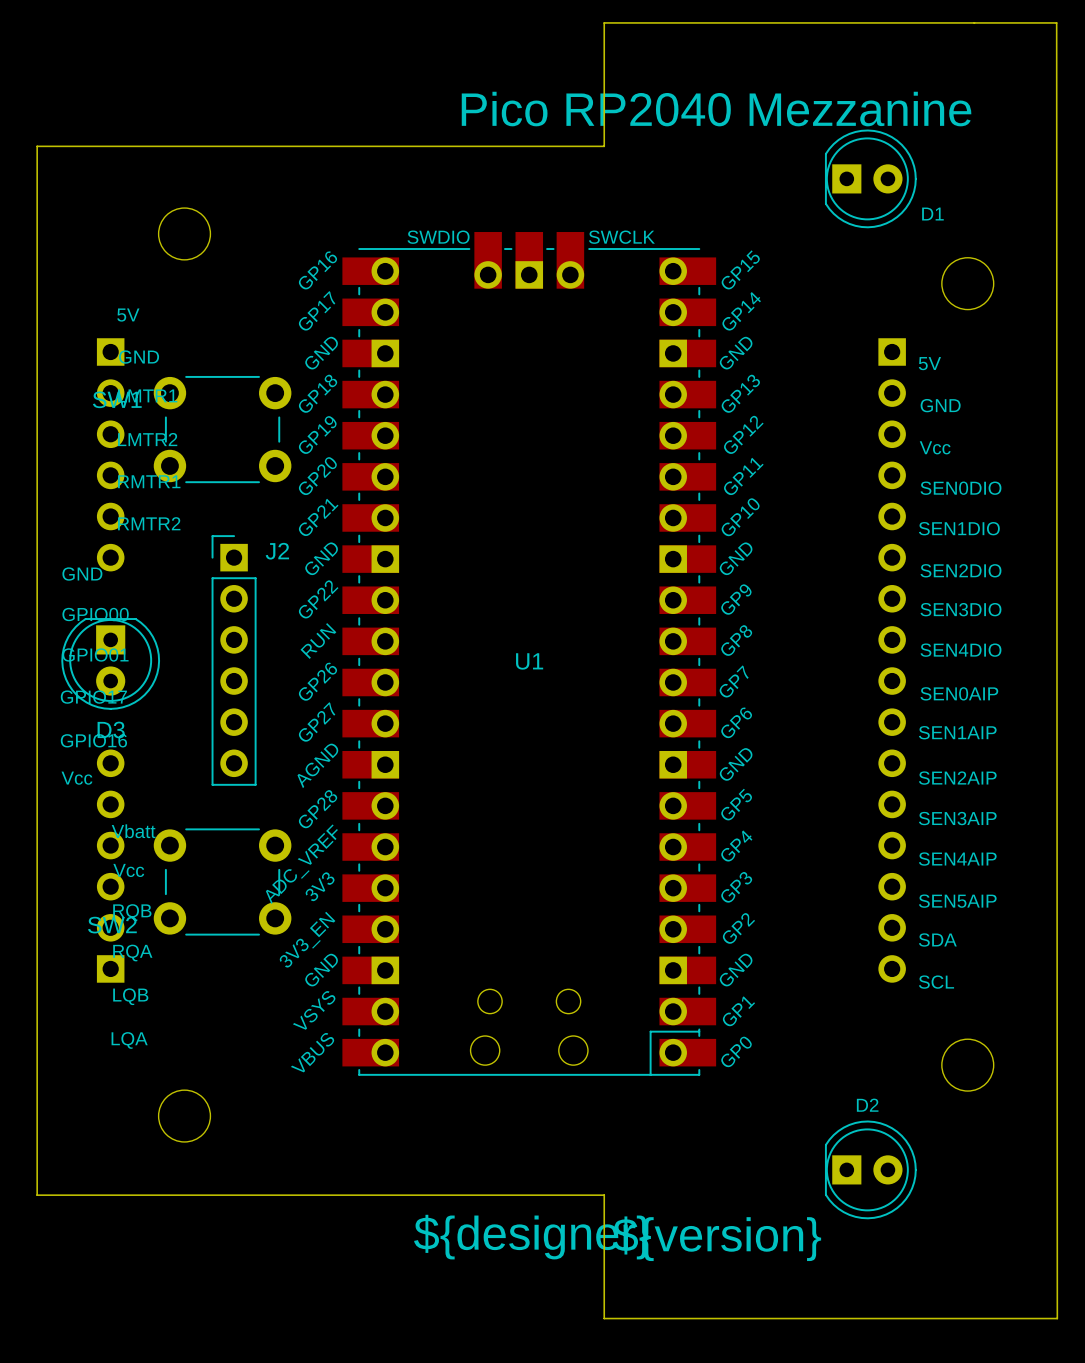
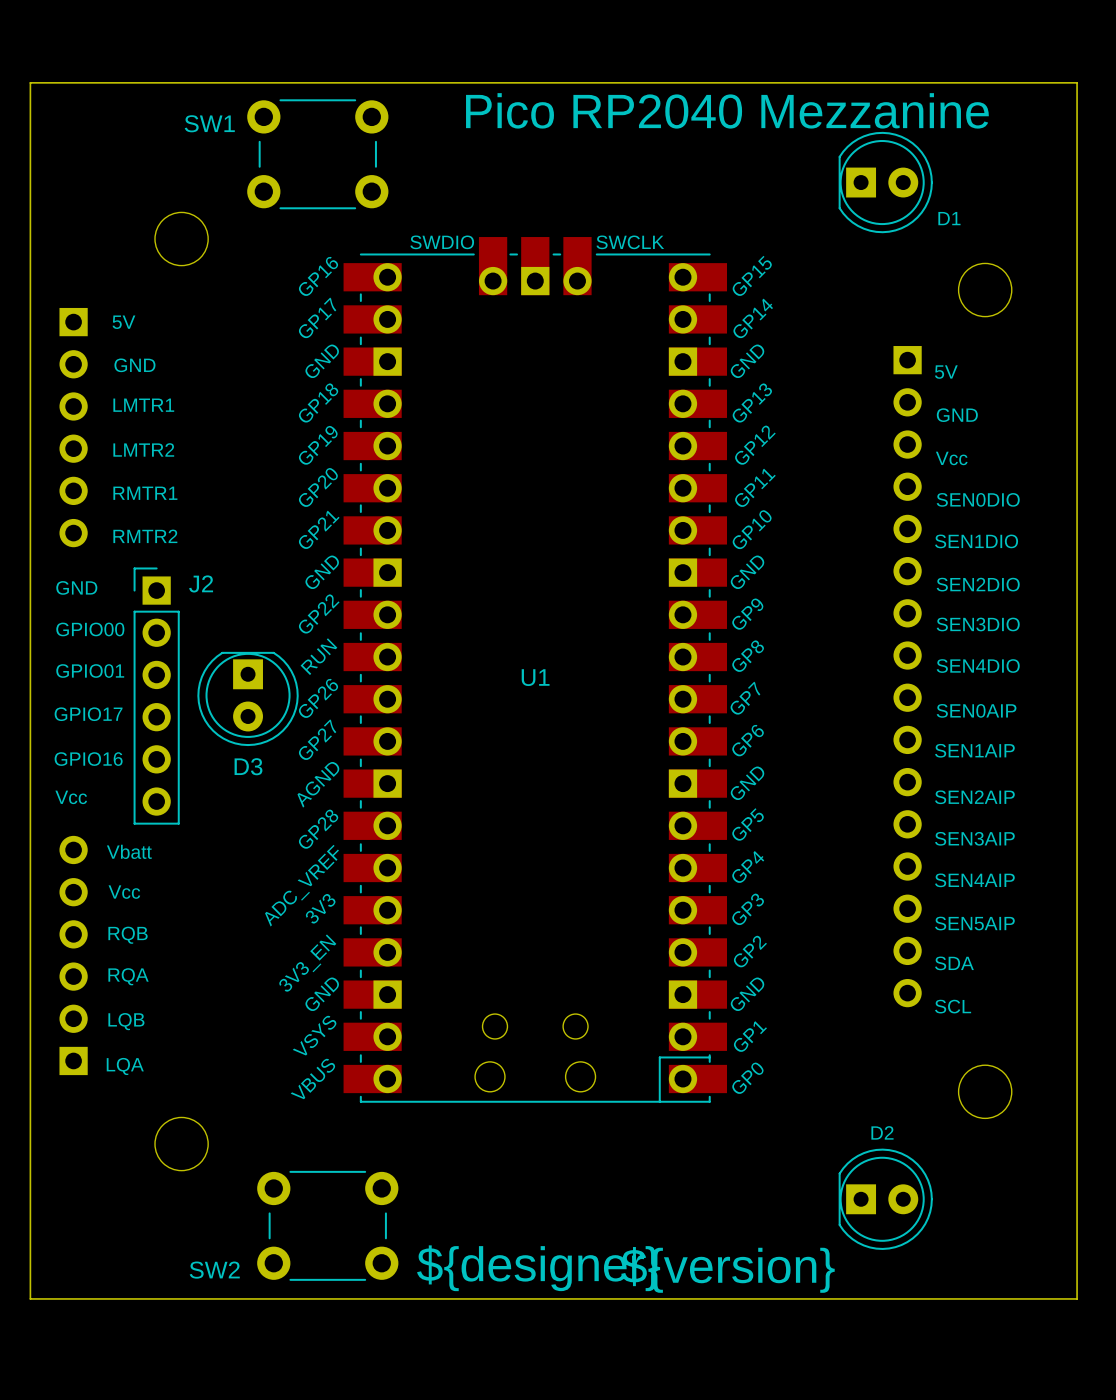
board edge: (37, 146) (604, 146) (604, 22) (1056, 22) (1057, 1318) (604, 1318) (604, 1195) (37, 1195) -> (30, 149) (30, 82) (1077, 82) (1077, 1298) (30, 1298) (30, 1225)
SW1 position: (222, 429) -> (317, 154)
part position: (110, 454) -> (73, 427)
J2 position: (234, 660) -> (156, 696)
D3 position: (110, 663) -> (248, 698)
part position: (110, 866) -> (73, 955)
SW2 position: (222, 881) -> (327, 1225)

